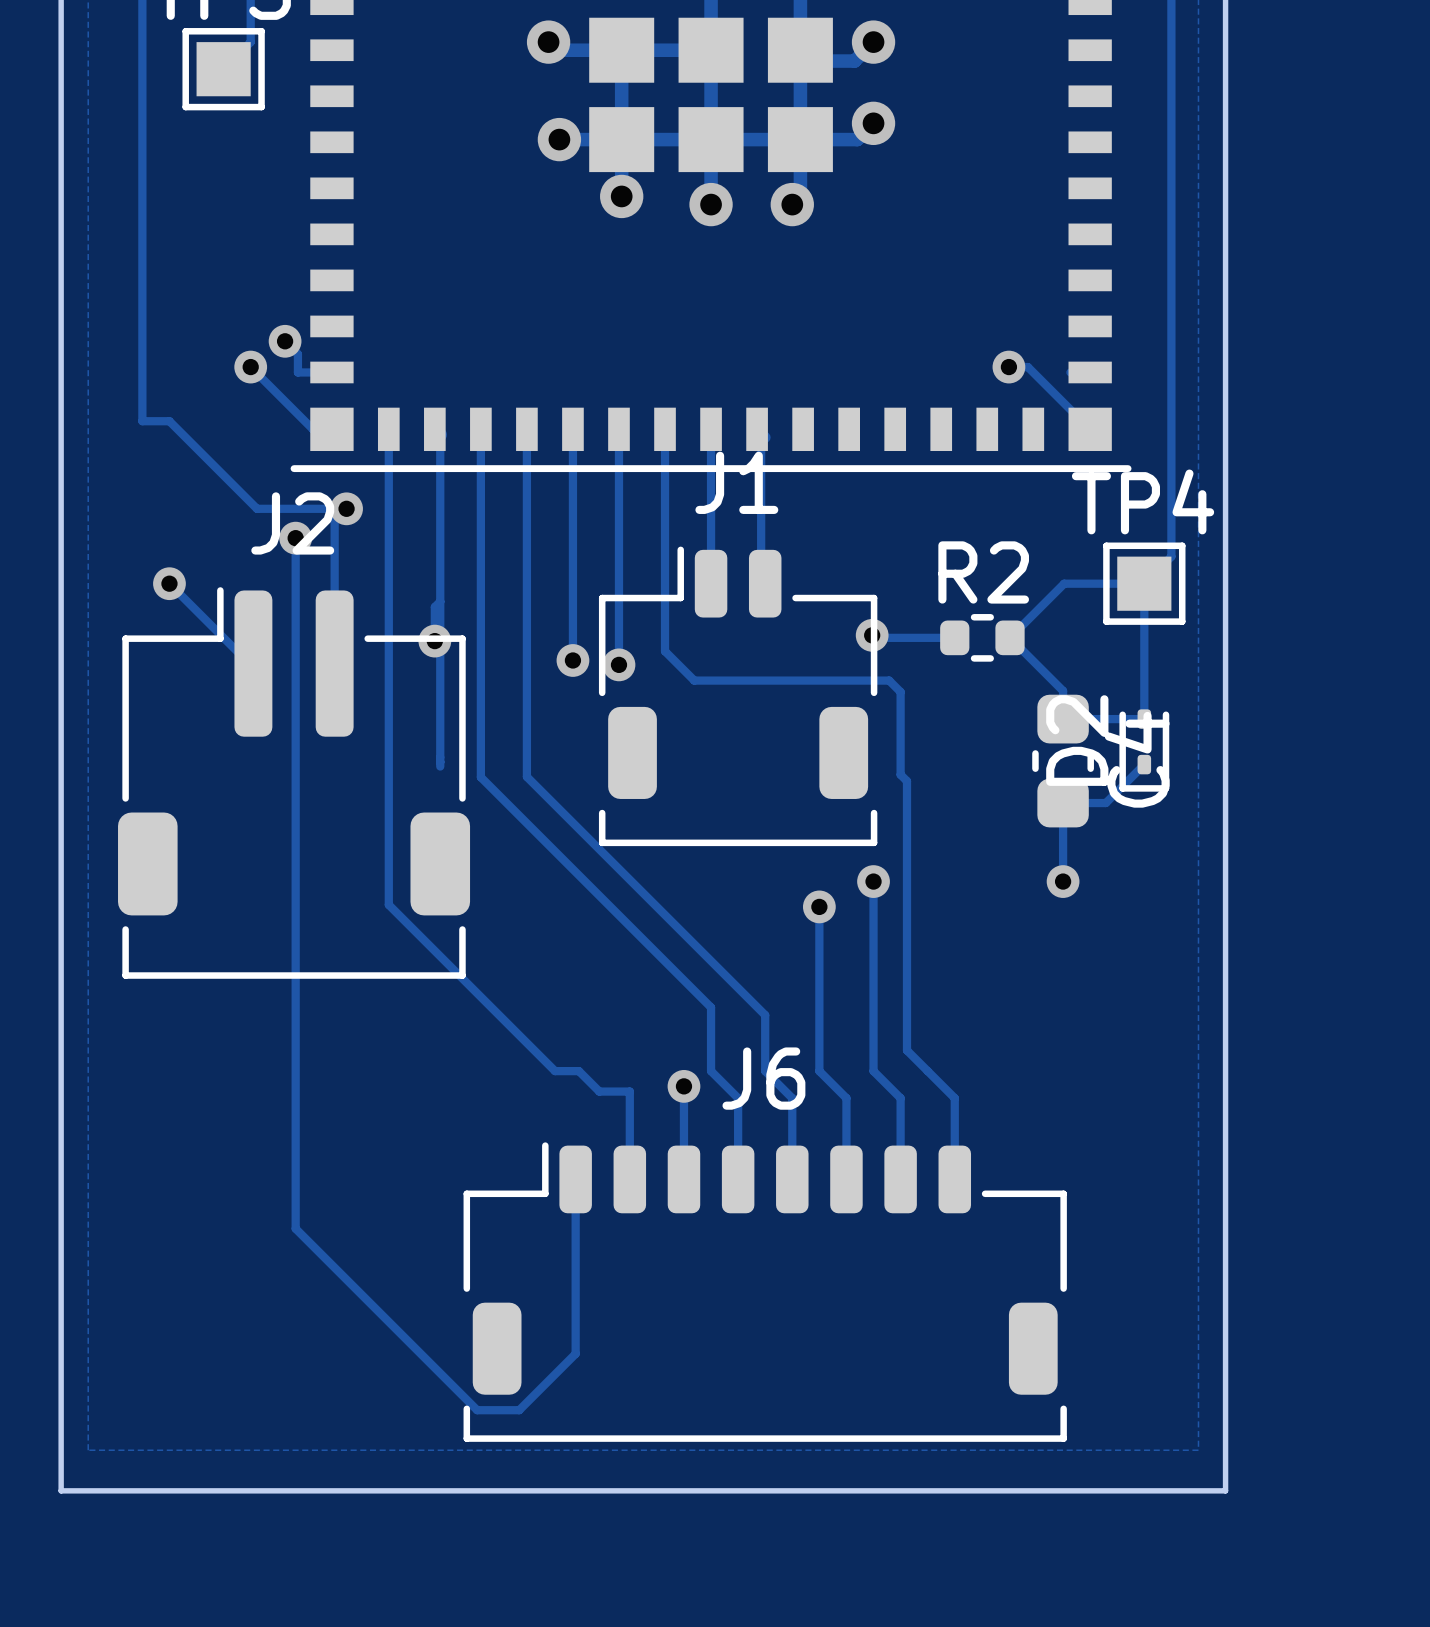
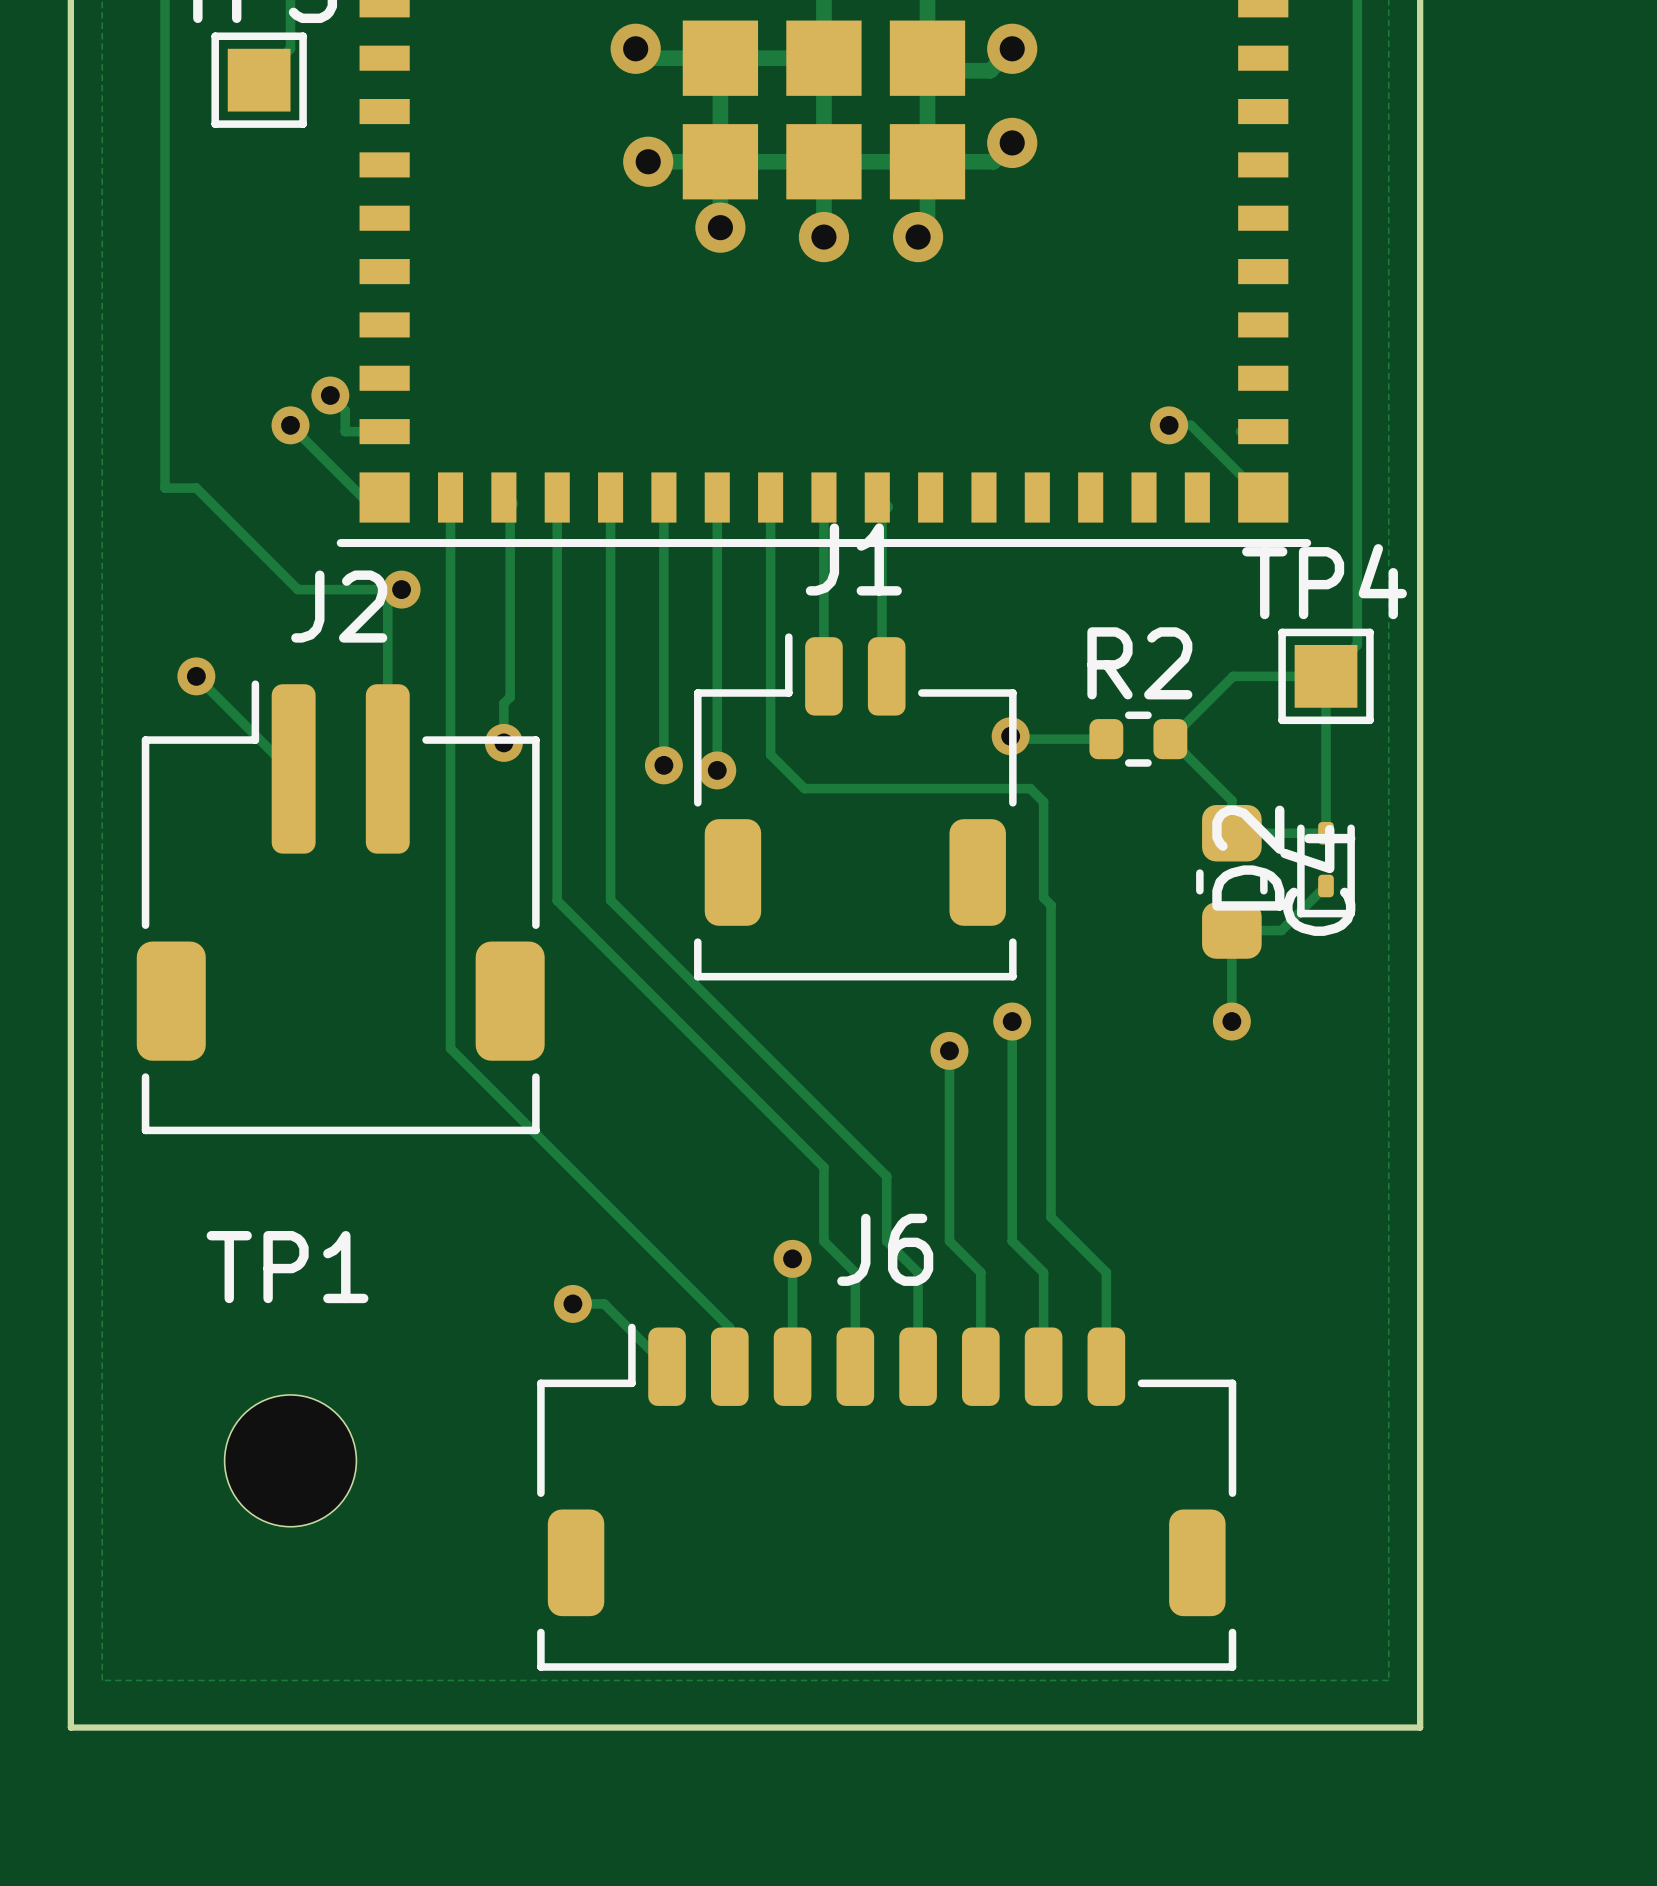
track: (295, 538) (295, 1228) (477, 1410) (519, 1410) (575, 1353) (575, 1179) -> (572, 1303) (604, 1303) (667, 1366)
via: (295, 538) -> none
track: (440, 601) (440, 766) -> none
track: (388, 904) (555, 1071) (578, 1071) (599, 1091) (629, 1091) (629, 1145) -> (450, 1048) (729, 1327)
via: none -> (572, 1303)
TP1: none -> (290, 1460)

